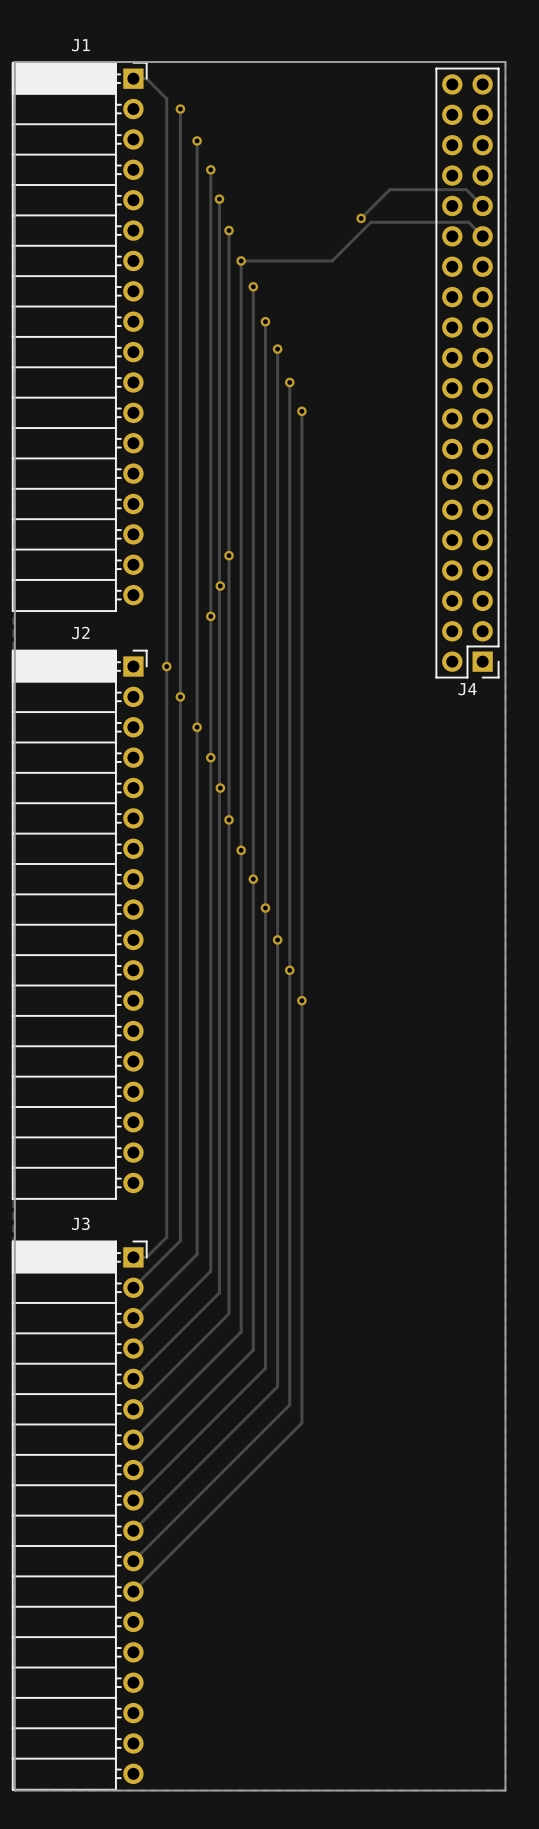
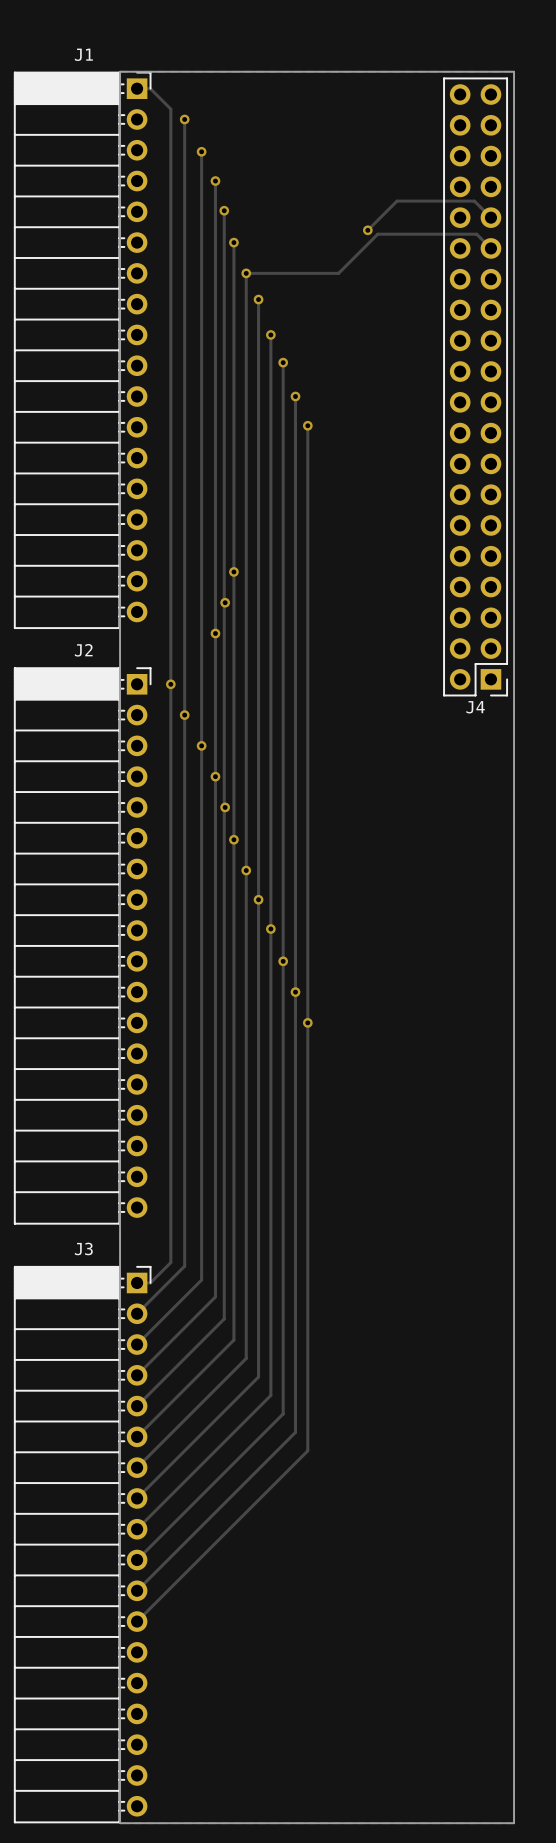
board edge: (116, 61) (14, 61) (14, 1790) (116, 1790) -> (120, 71) (120, 1823)

